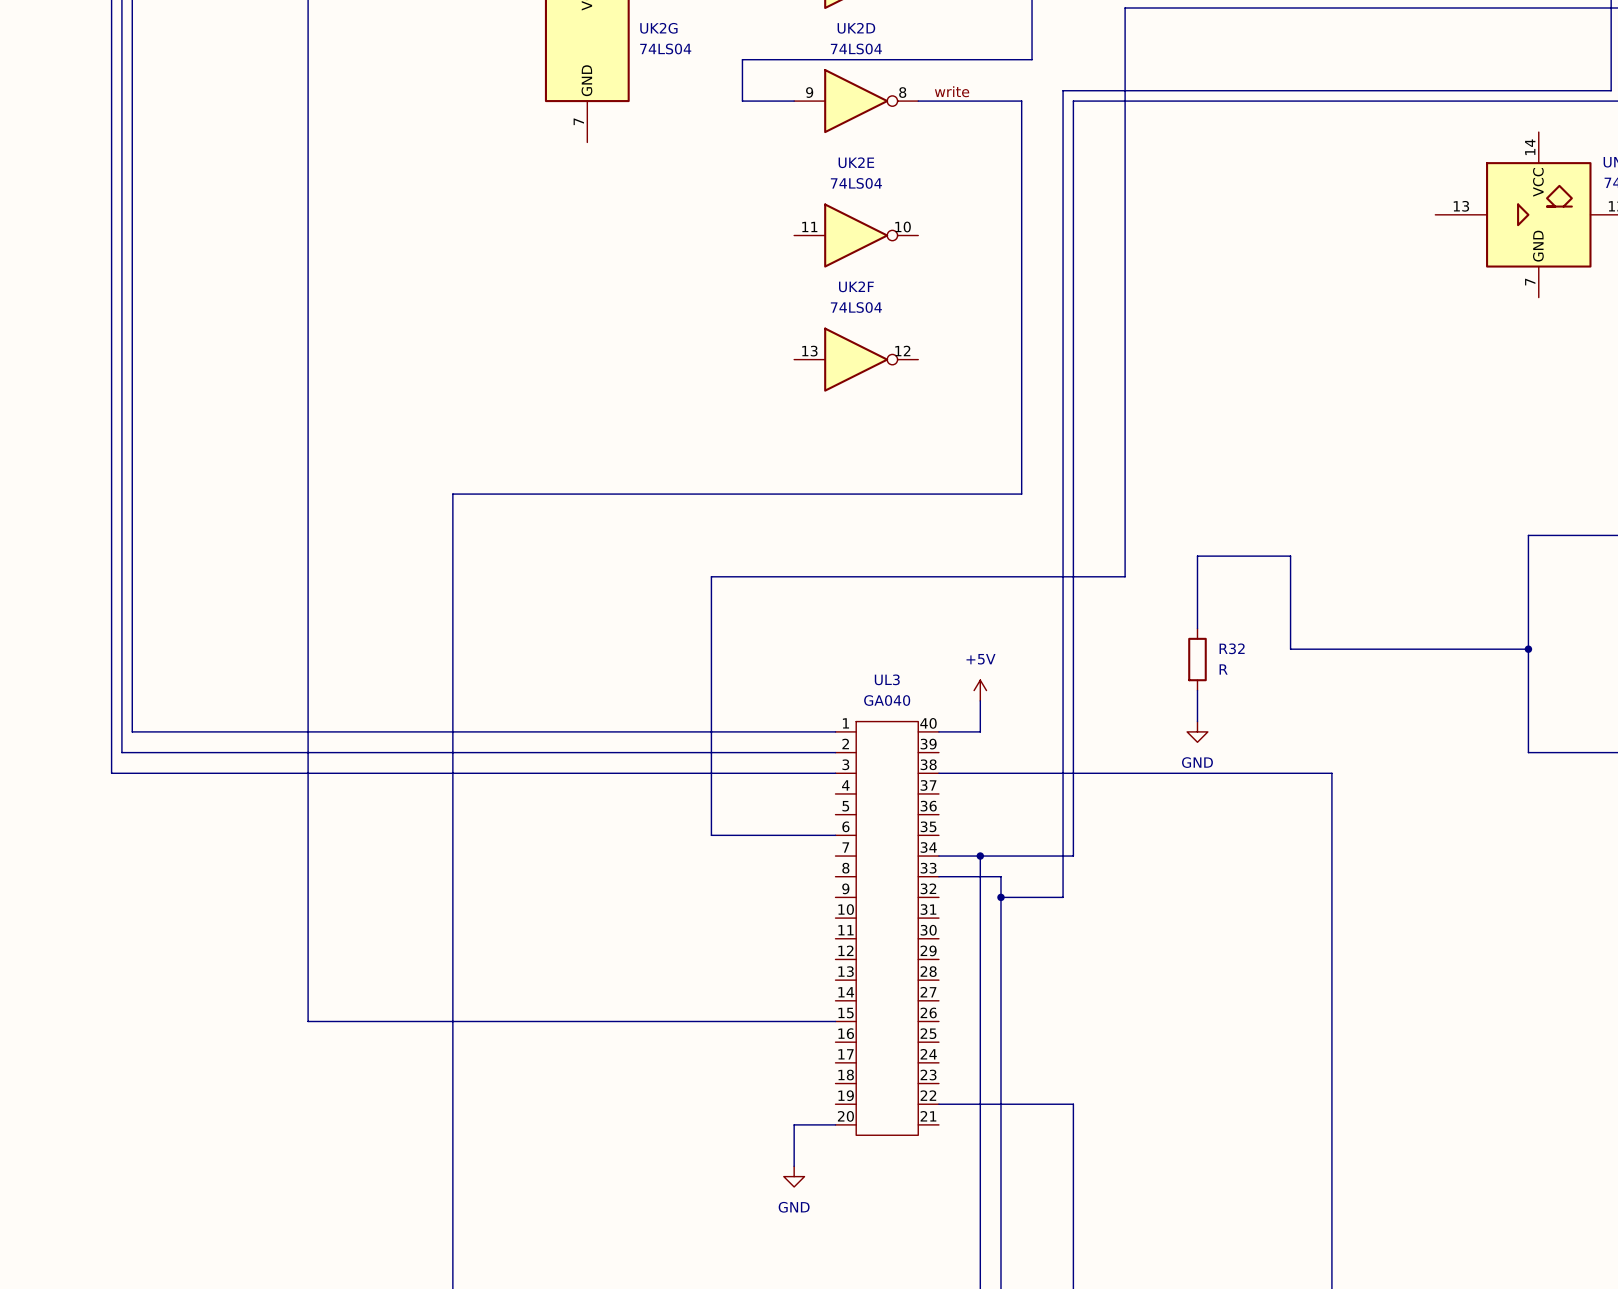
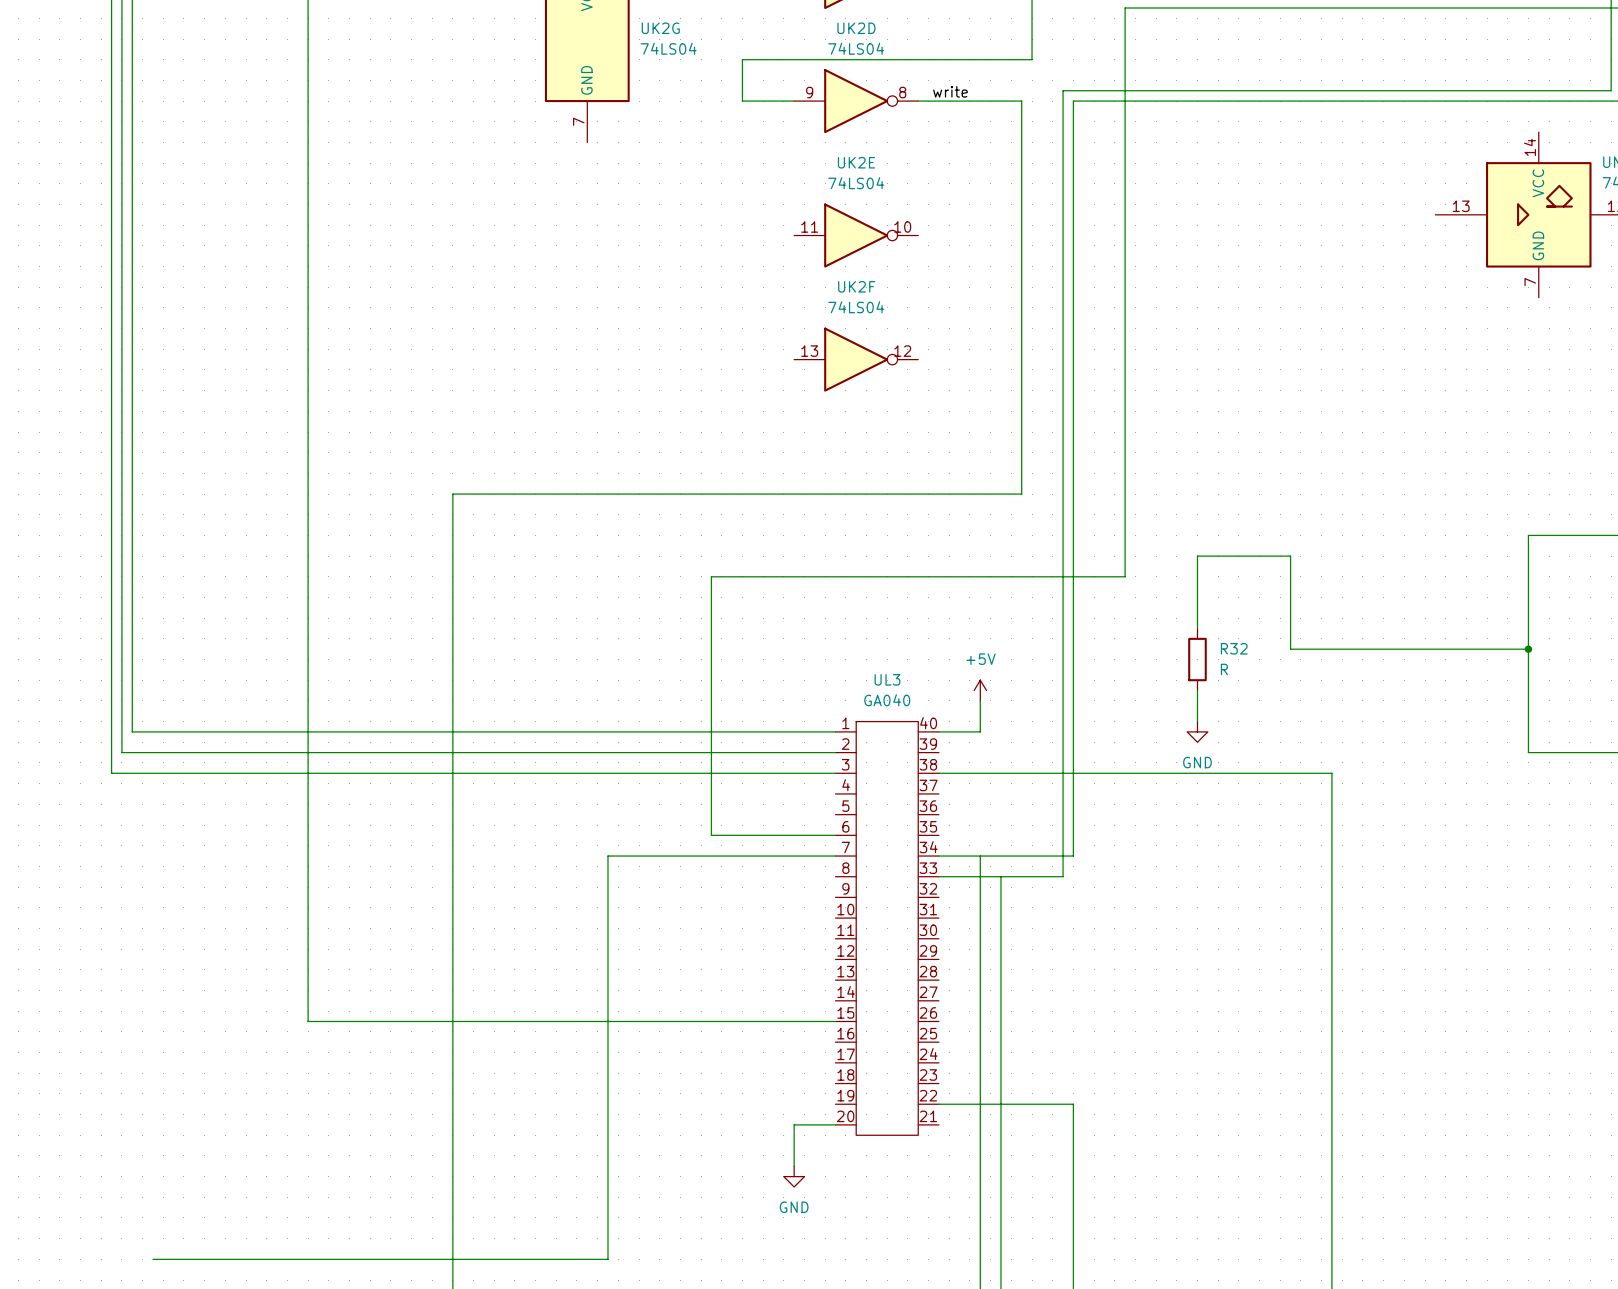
wire: none -> (835, 856) (608, 856) (608, 1259) (152, 1259)
junction: (980, 856) -> none
wire: (1063, 876) (1063, 897) (1000, 897) -> (1063, 876) (1000, 876)
junction: (1000, 897) -> none

